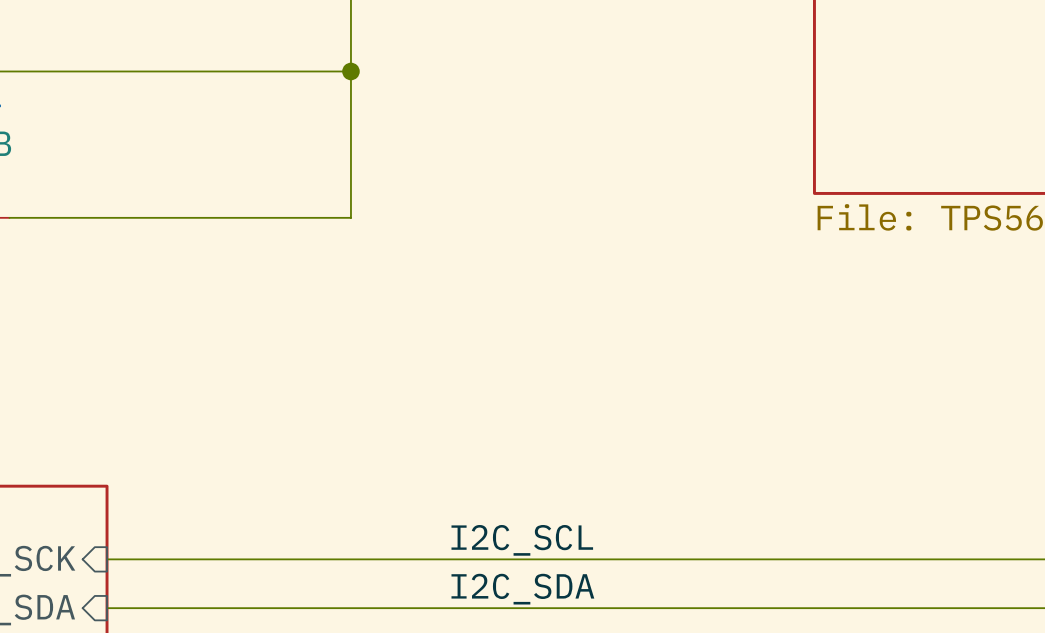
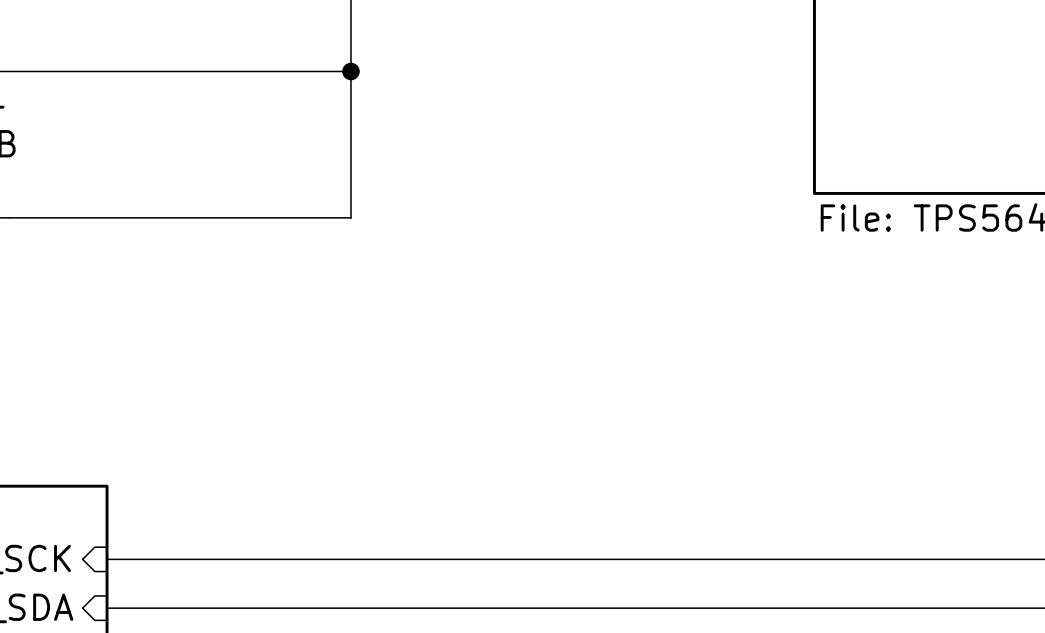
label: I2C_SCL (522, 540) -> none
label: I2C_SDA (522, 589) -> none

